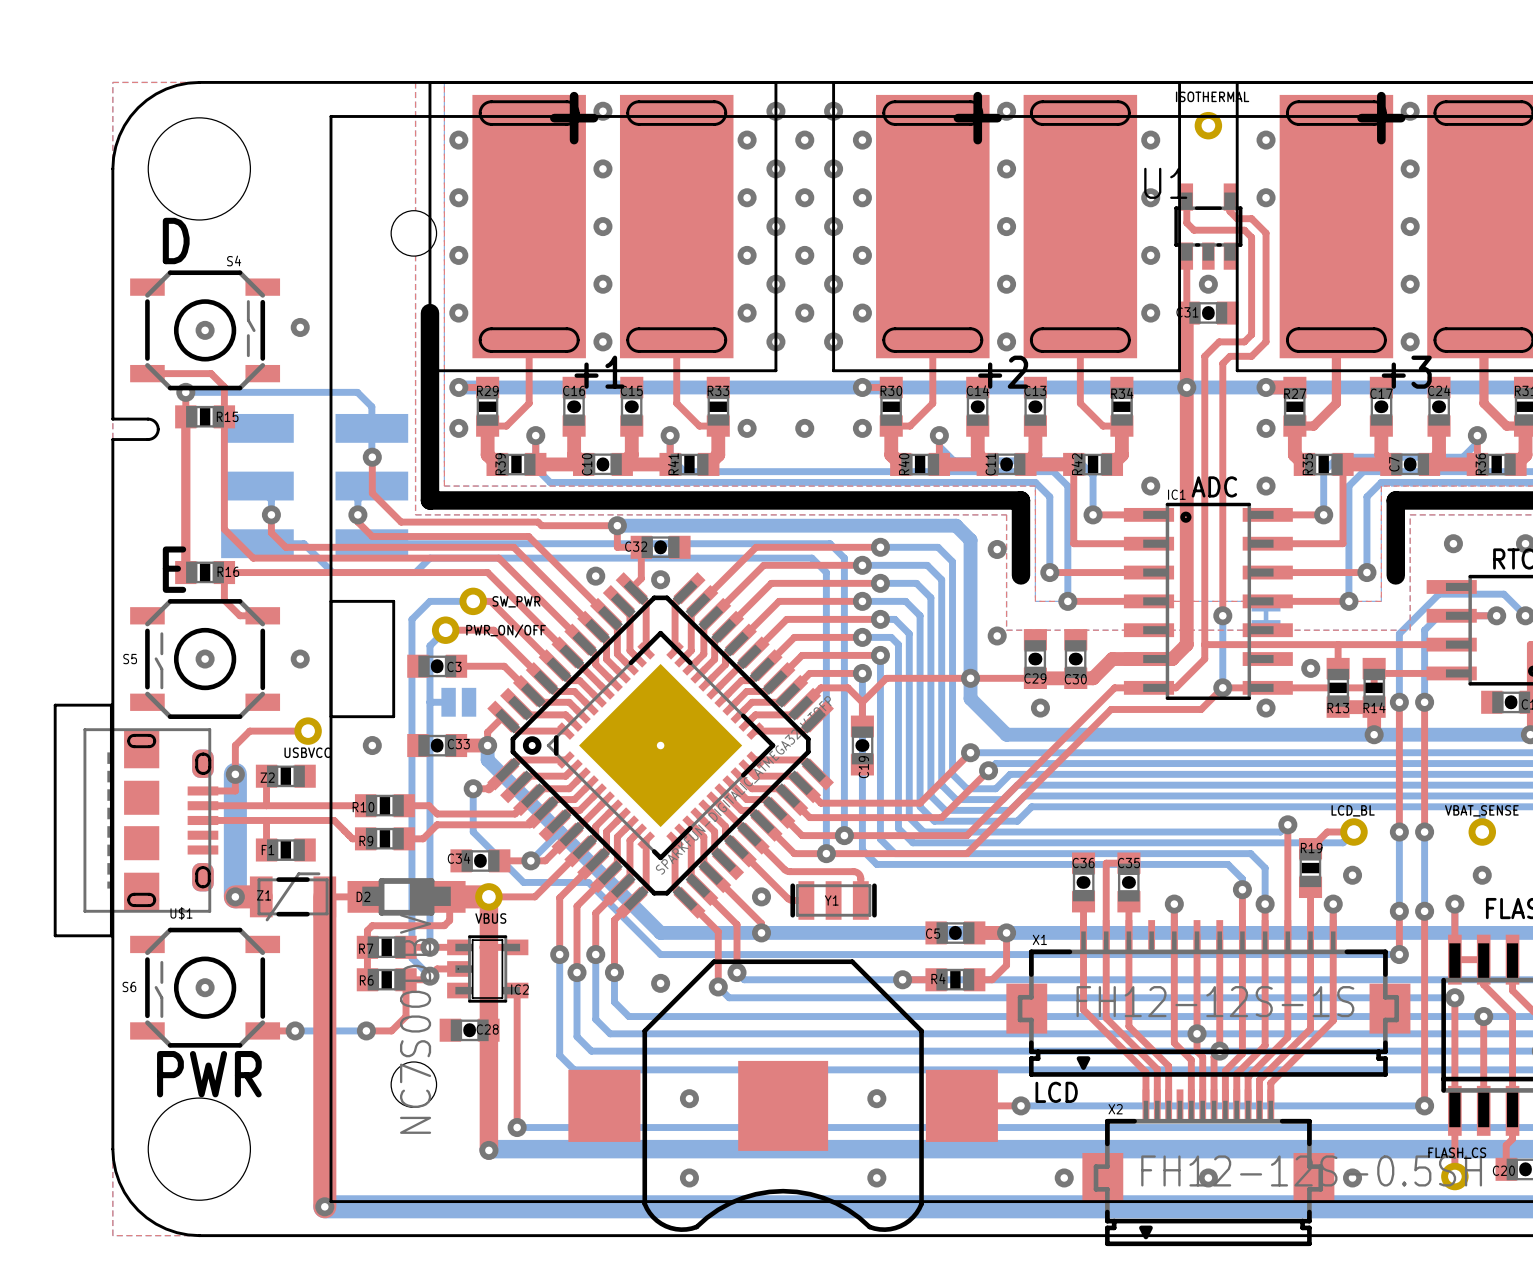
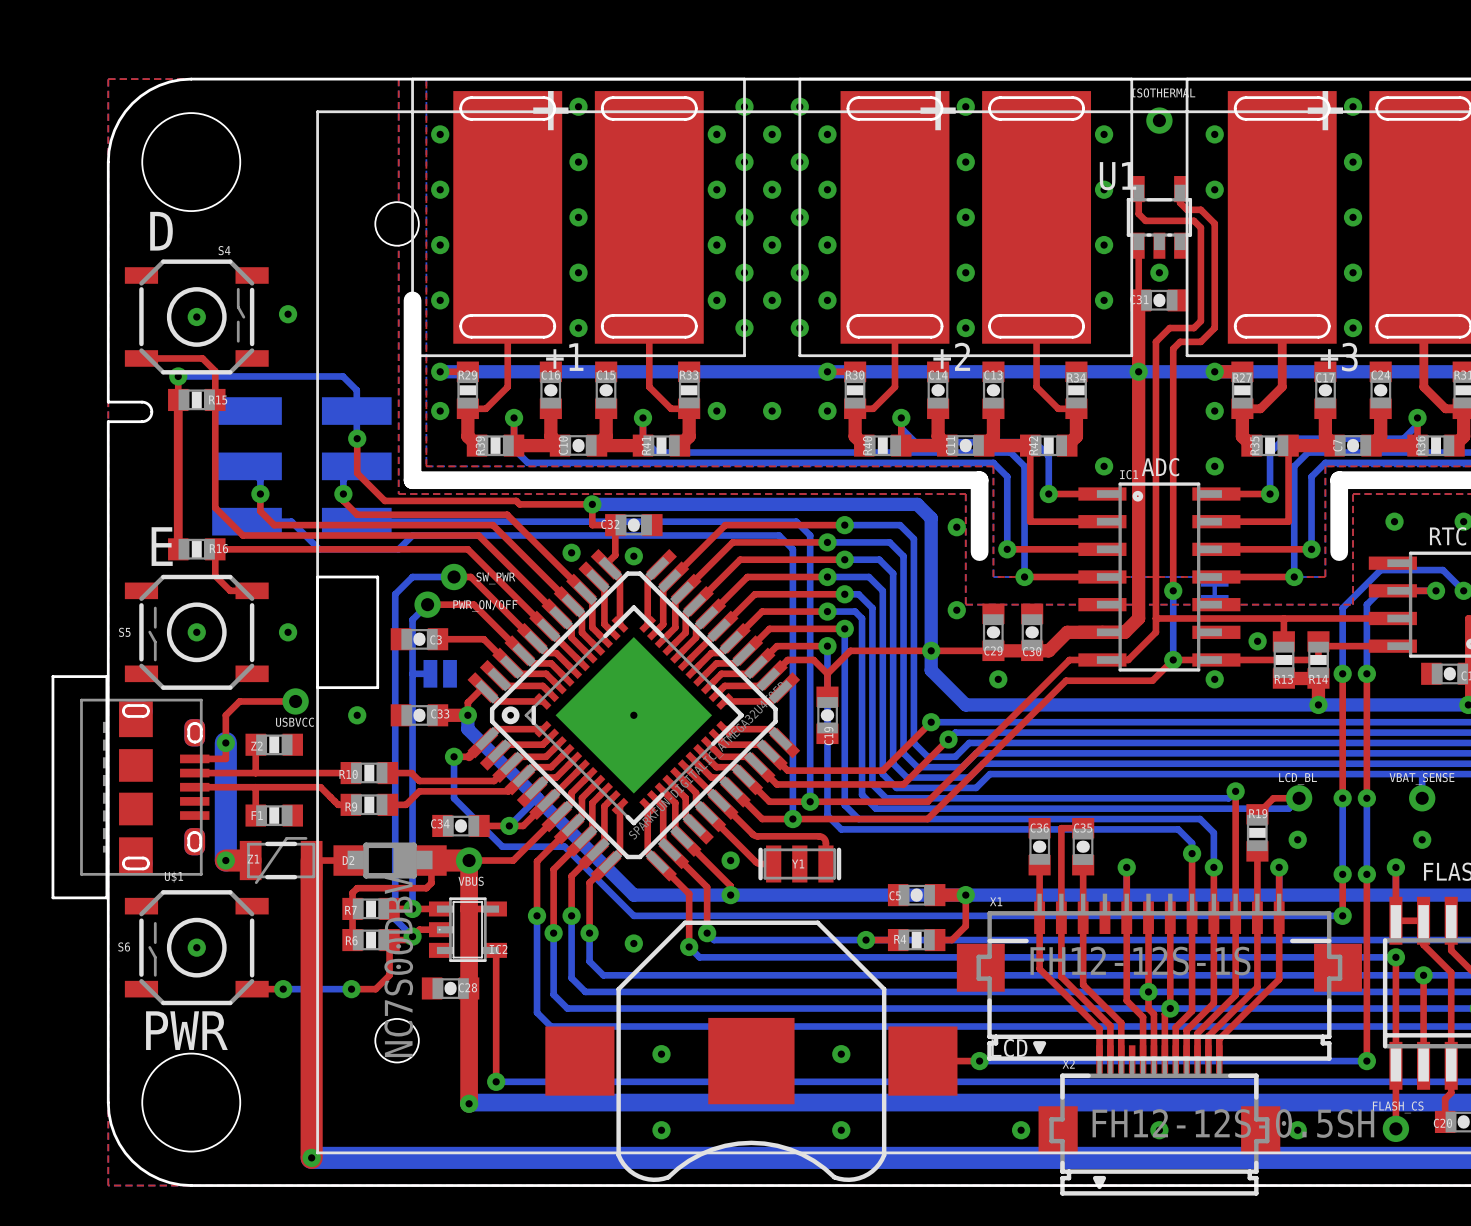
X1 footprint: [1006, 920, 1411, 1077] -> [956, 893, 1362, 1061]

